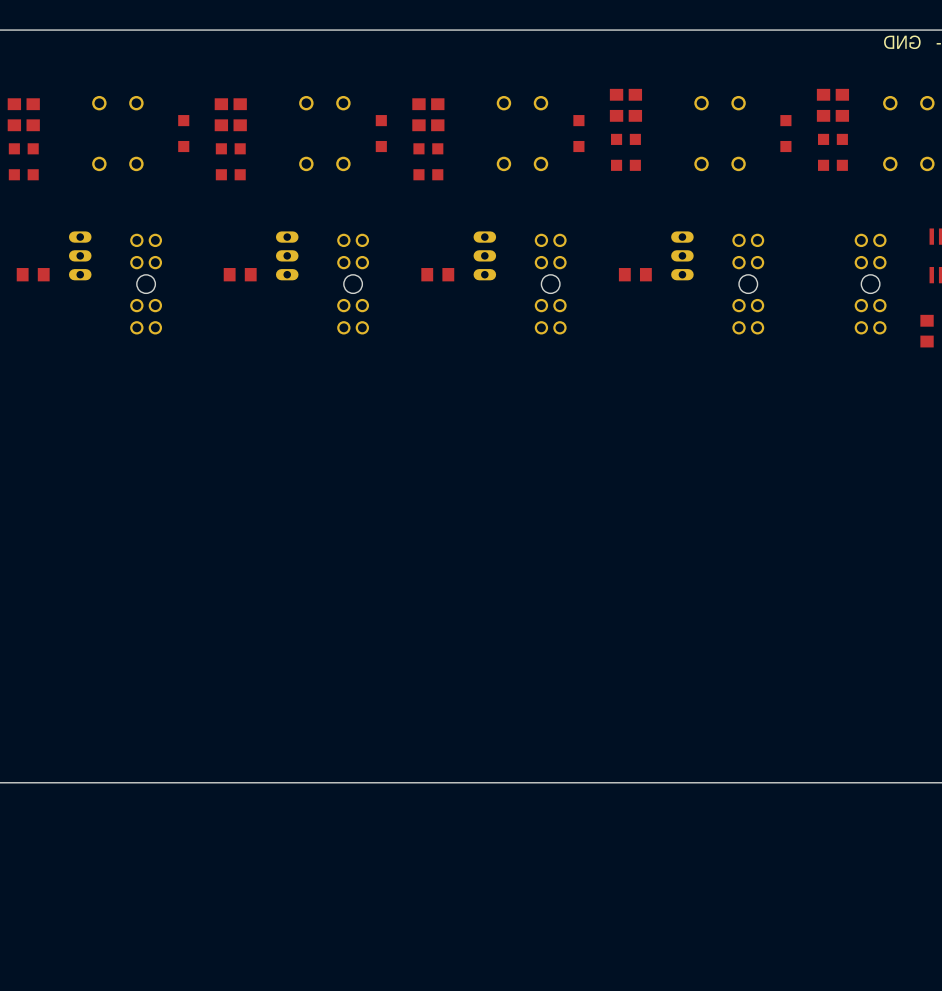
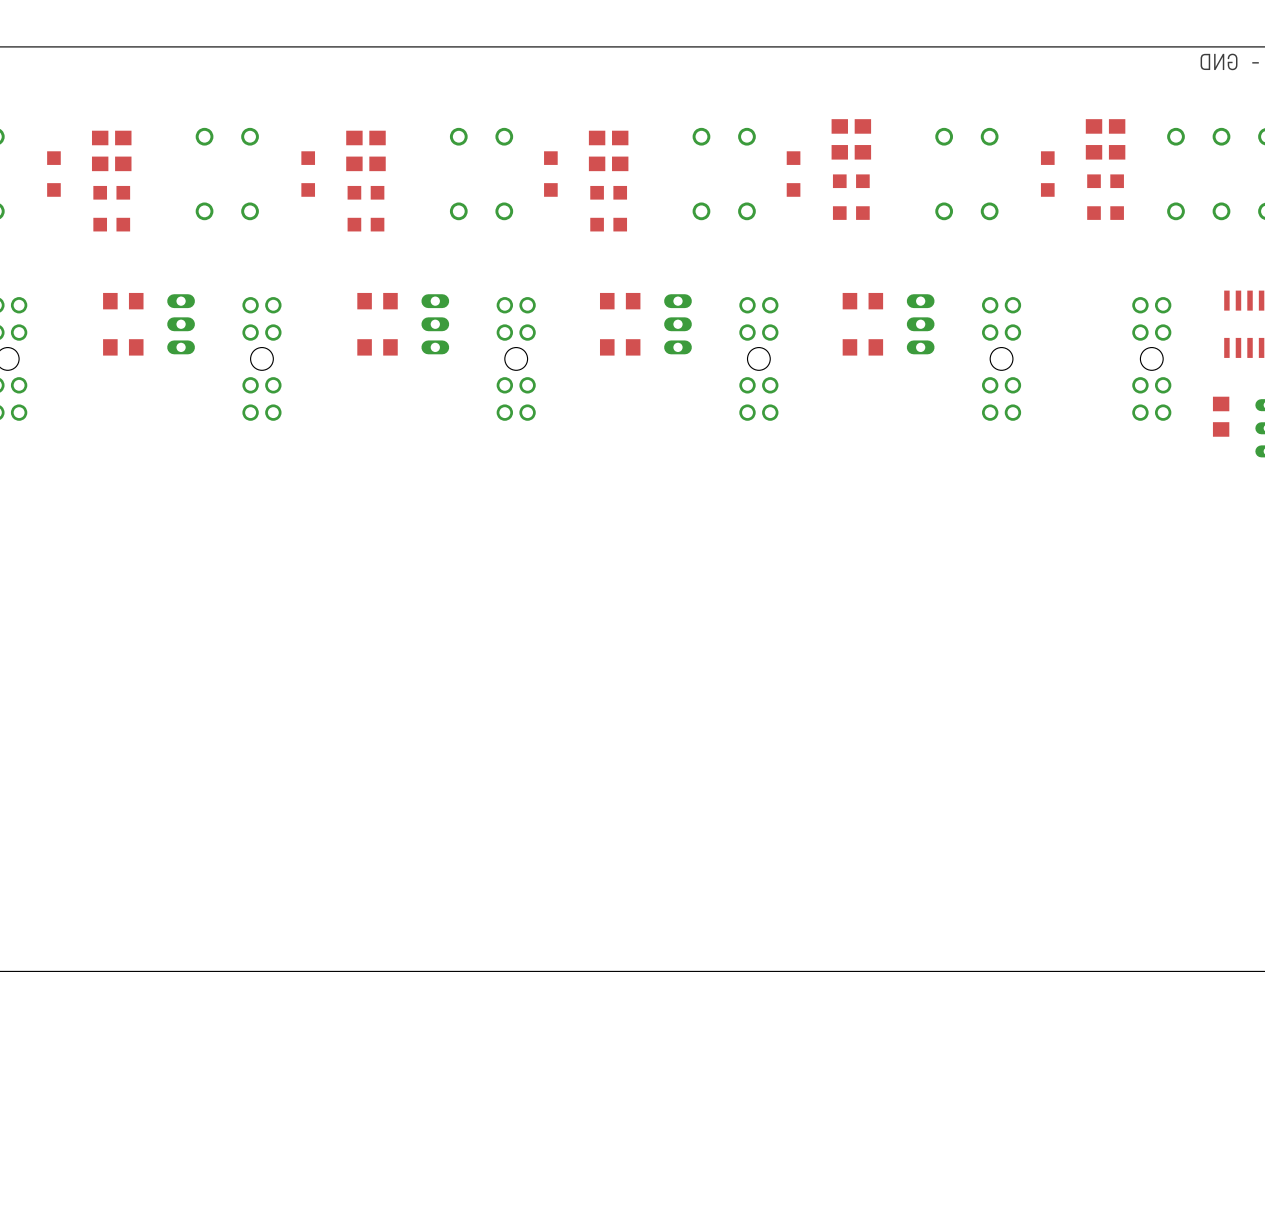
part: none -> (123, 301)
part: none -> (377, 301)
part: none -> (620, 301)
part: none -> (862, 301)

